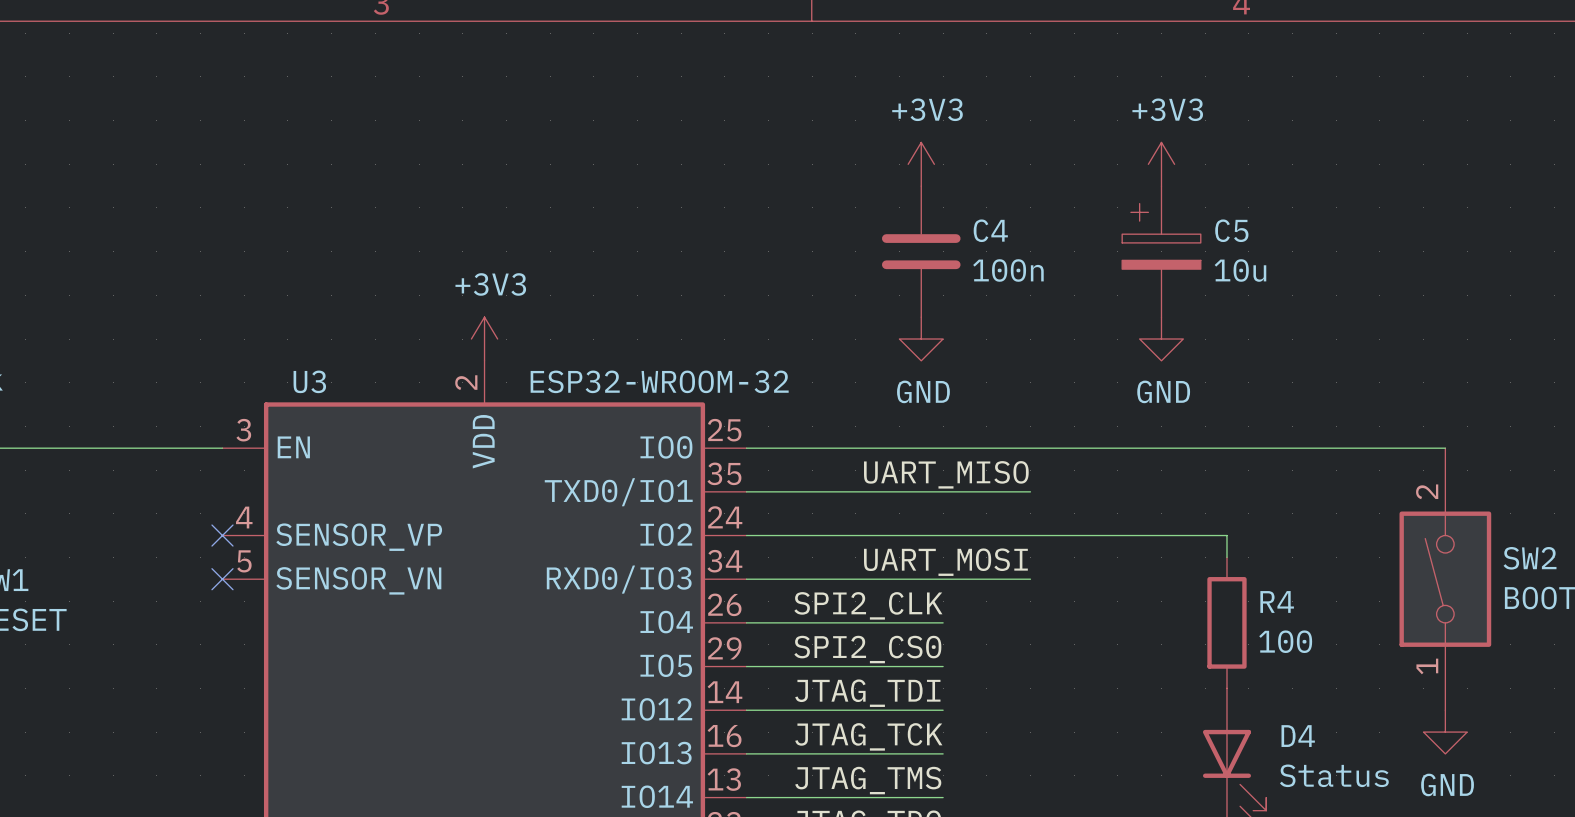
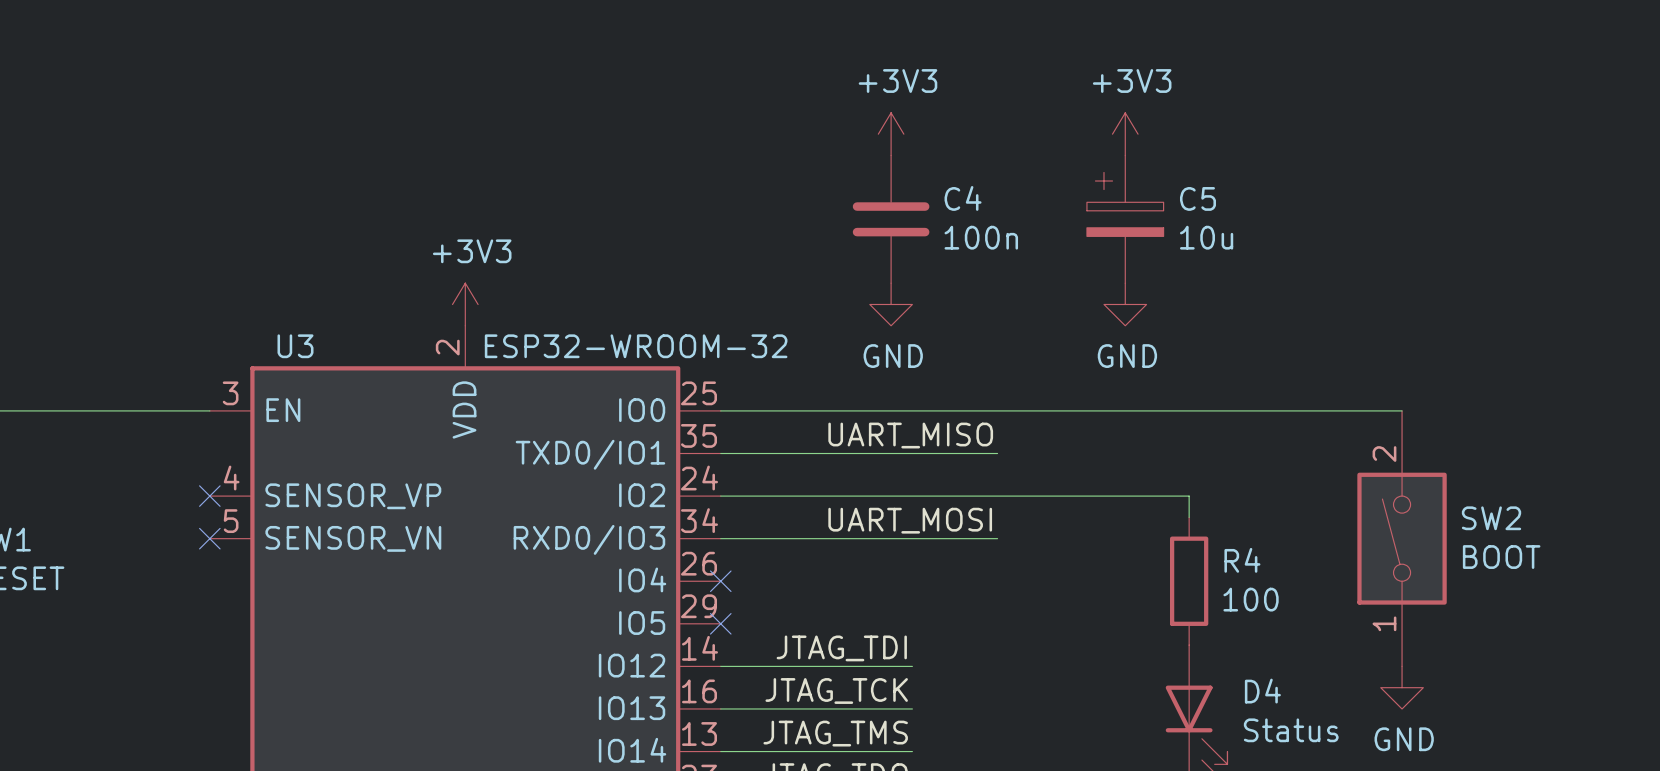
label: SPI2_CLK (868, 605) -> none
wire: (746, 622) (943, 622) -> none
no-connect mark: none -> (720, 581)
label: SPI2_CS0 (867, 649) -> none
wire: (746, 666) (943, 666) -> none
no-connect mark: none -> (720, 623)

